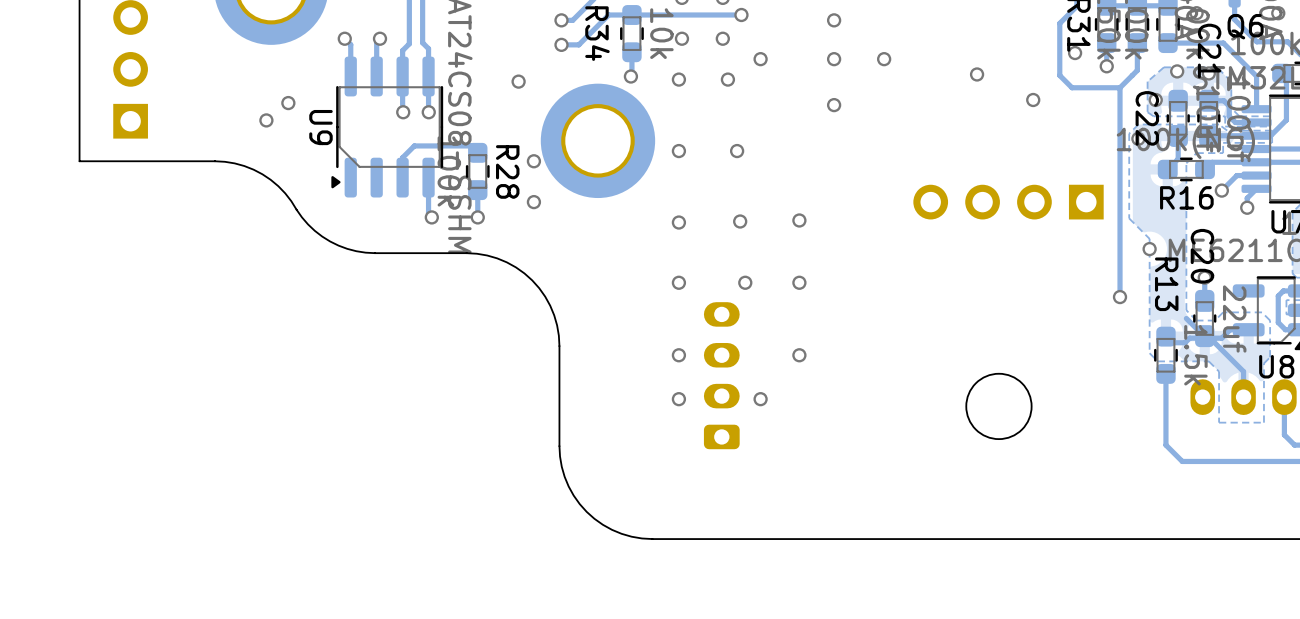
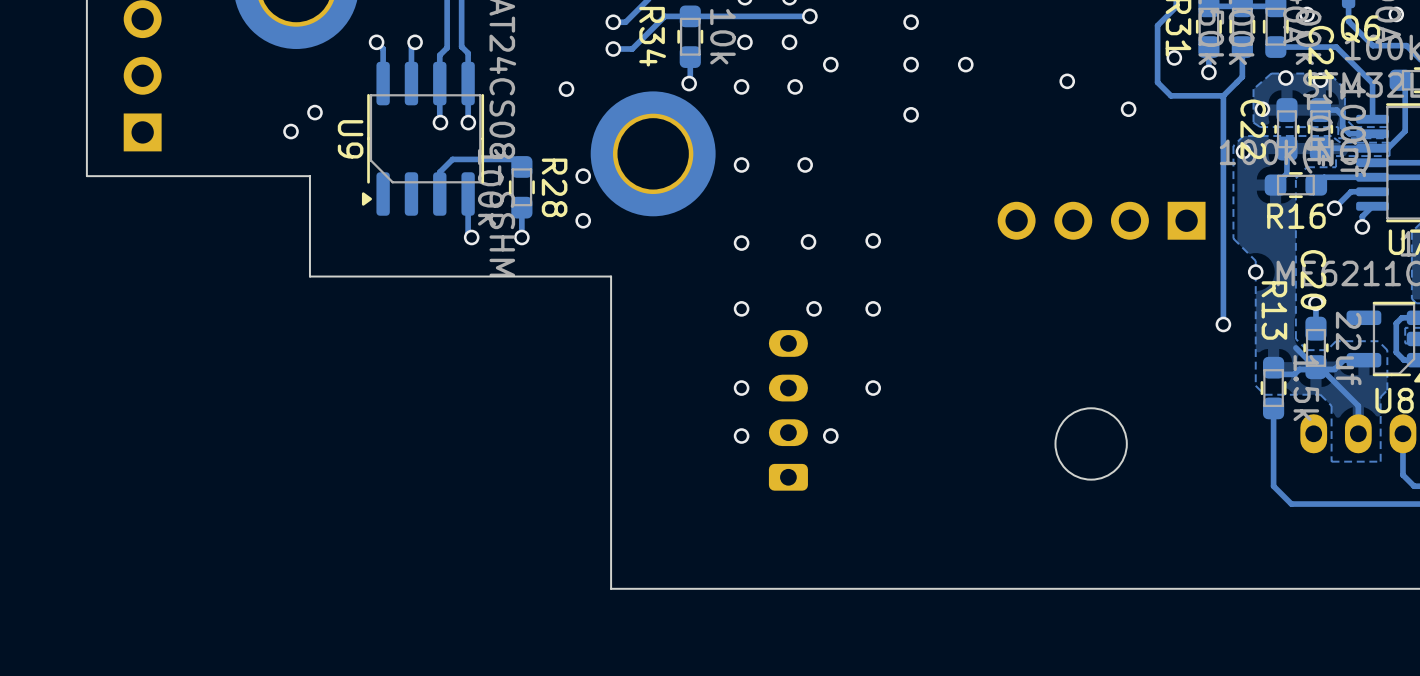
board edge: (215, 161) (244, 166) (262, 174) (285, 193) (301, 217) (322, 236) (347, 248) (374, 253) -> (234, 176) (309, 176) (309, 276) (409, 276)
board edge: (466, 253) (497, 258) (515, 267) (532, 280) (545, 296) (554, 315) (559, 346) -> (509, 276) (611, 276) (611, 378)
board edge: (559, 446) (561, 466) (568, 486) (586, 511) (602, 524) (621, 533) (652, 539) -> (611, 487) (611, 588) (712, 588)

